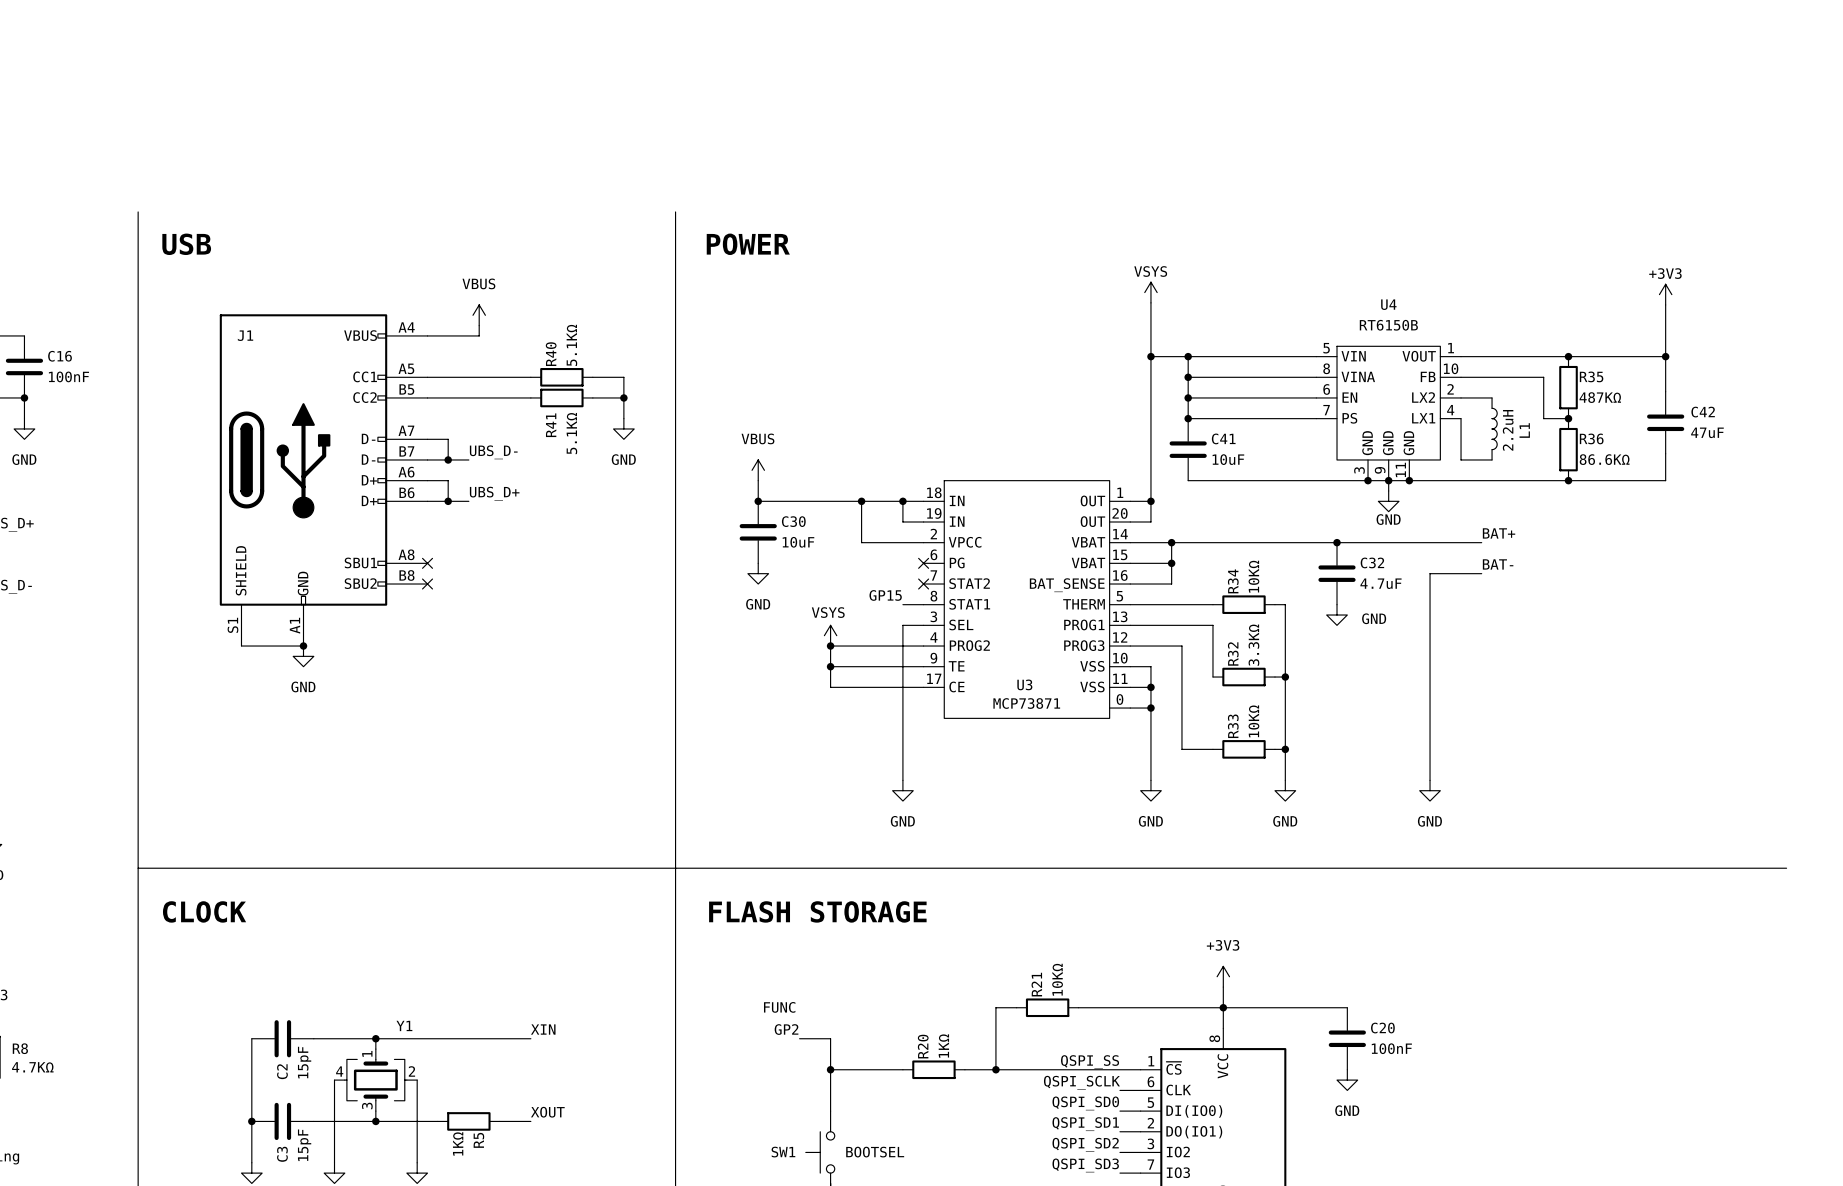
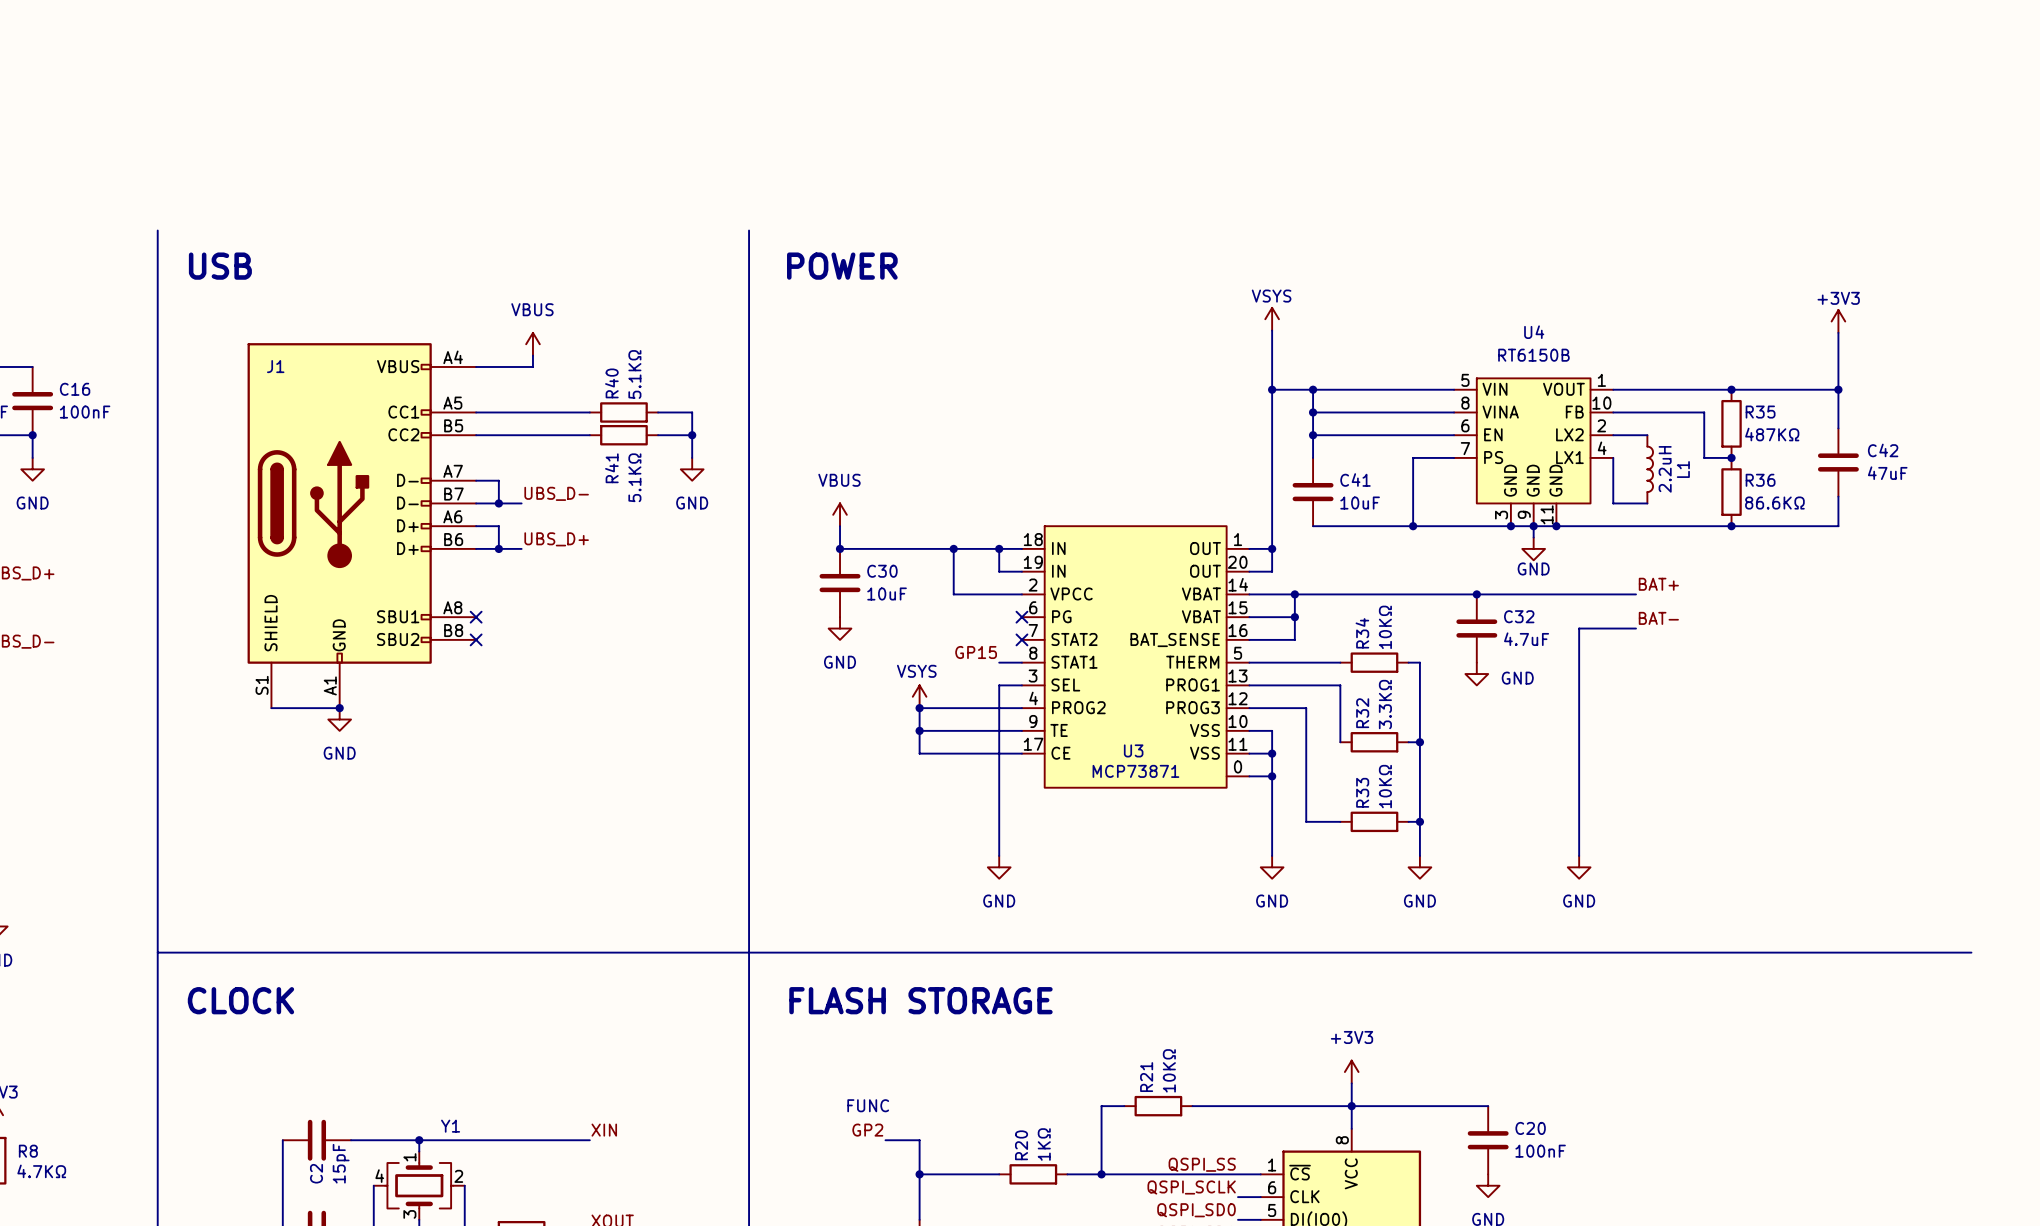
wire: (1188, 418) (1279, 418) -> (1413, 526) (1413, 457)
junction: (1188, 418) -> none
junction: none -> (1413, 526)

